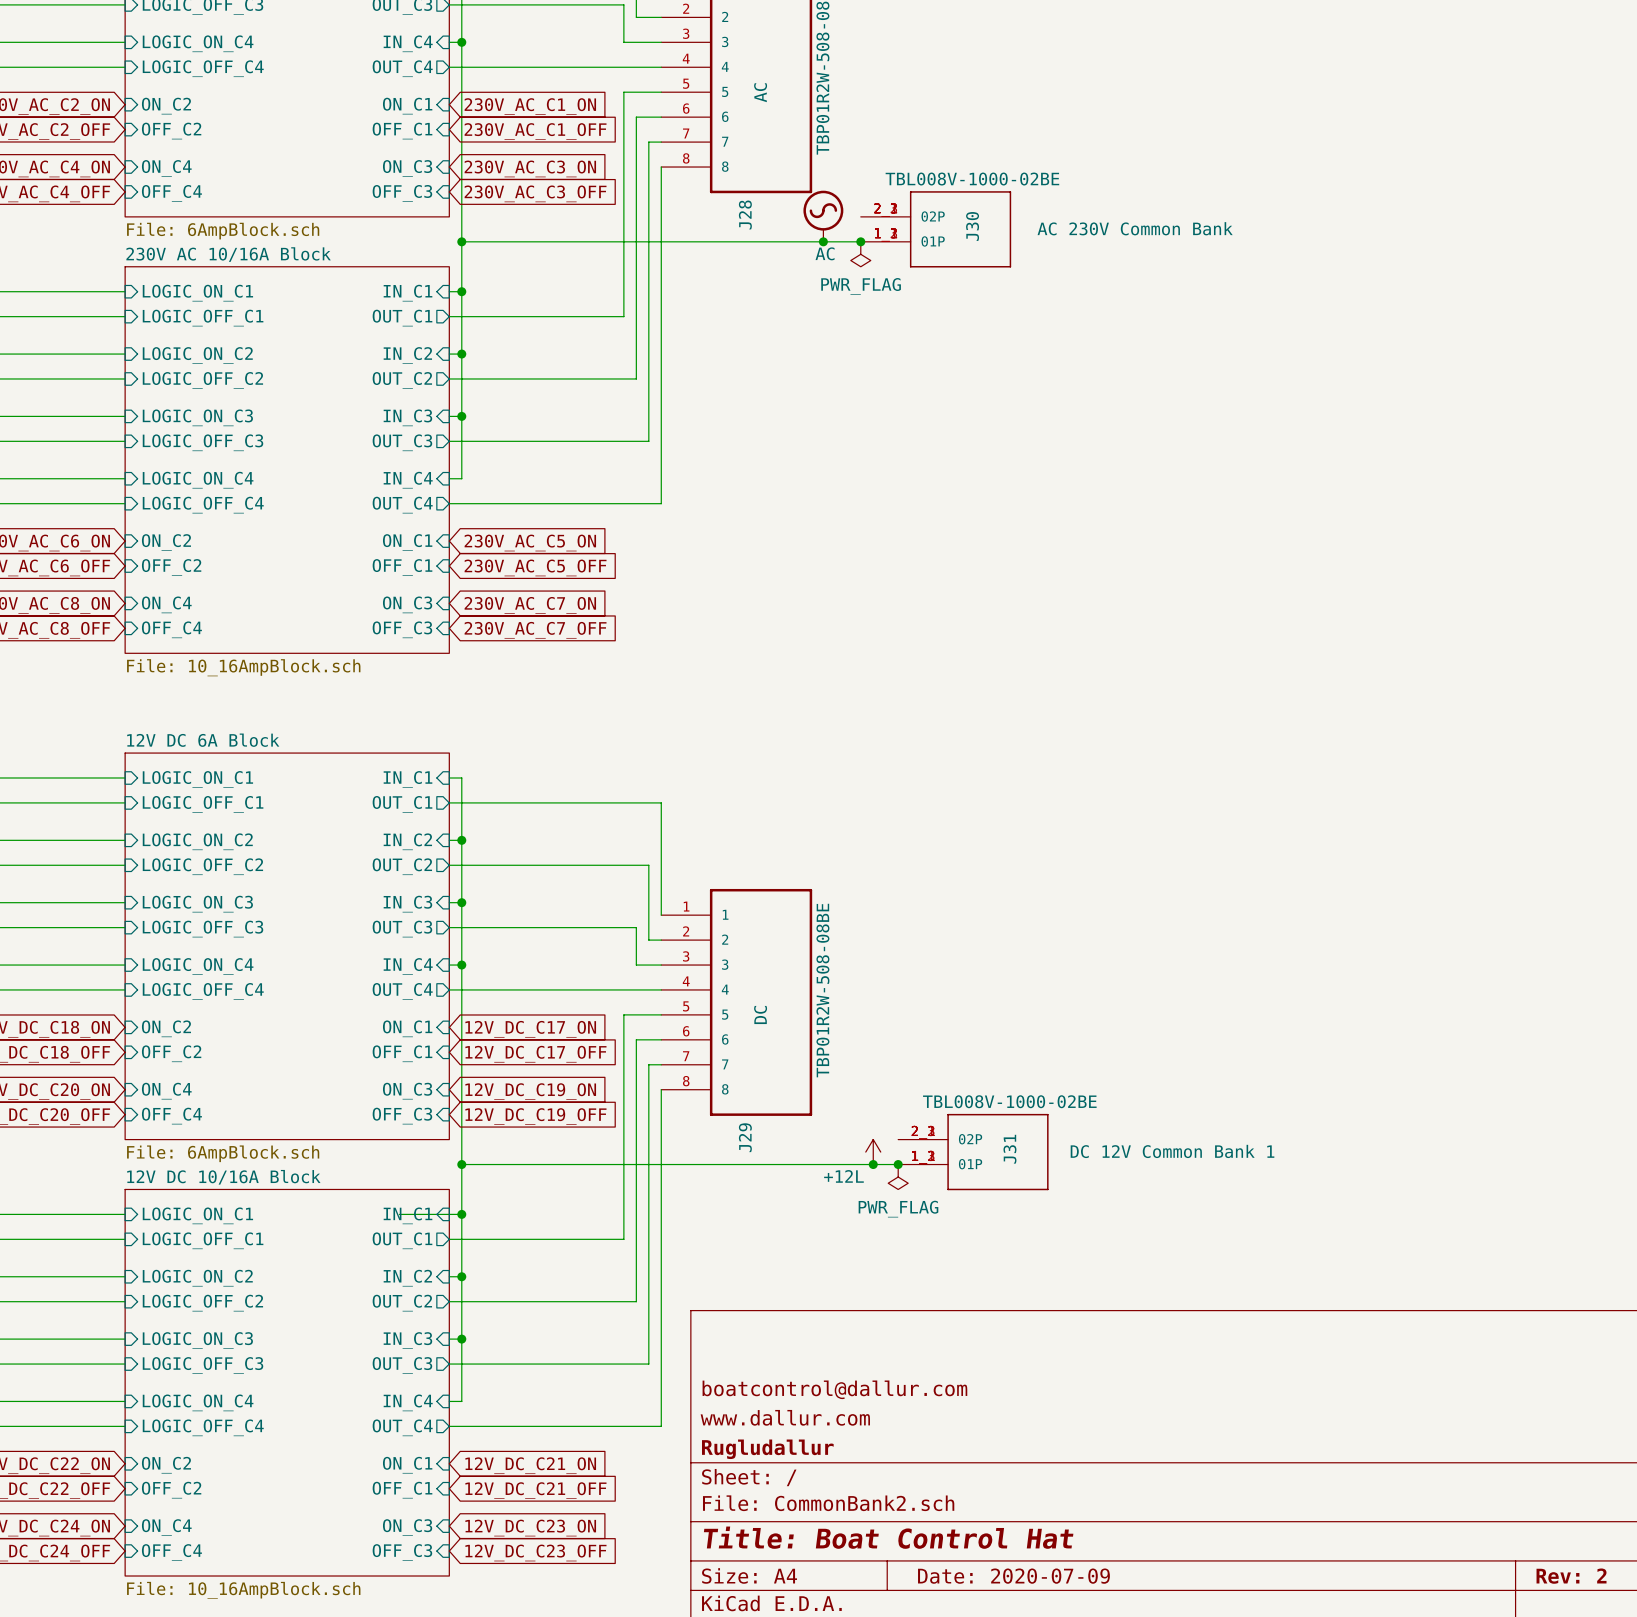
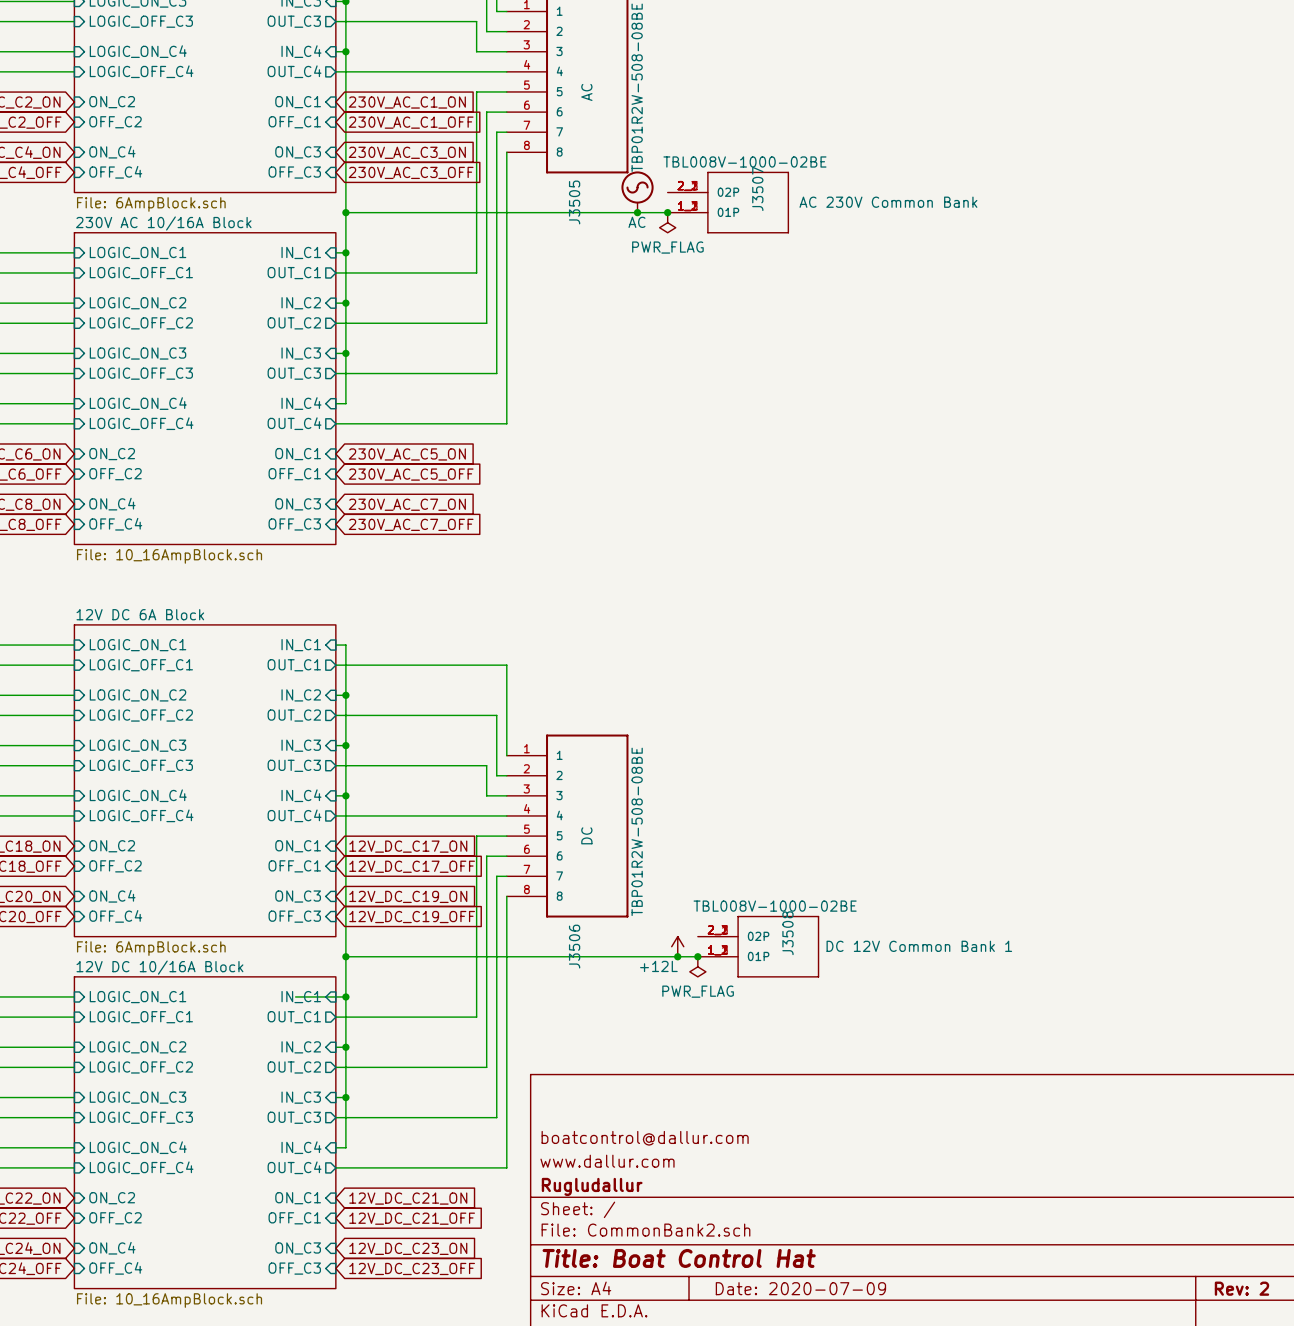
J28 name: J28 (745, 214) -> J3505 (574, 202)
J30 name: J30 (972, 226) -> J3507 (757, 188)
J29 name: J29 (745, 1137) -> J3506 (574, 946)
J31 name: J31 (1009, 1149) -> J3508 (787, 933)

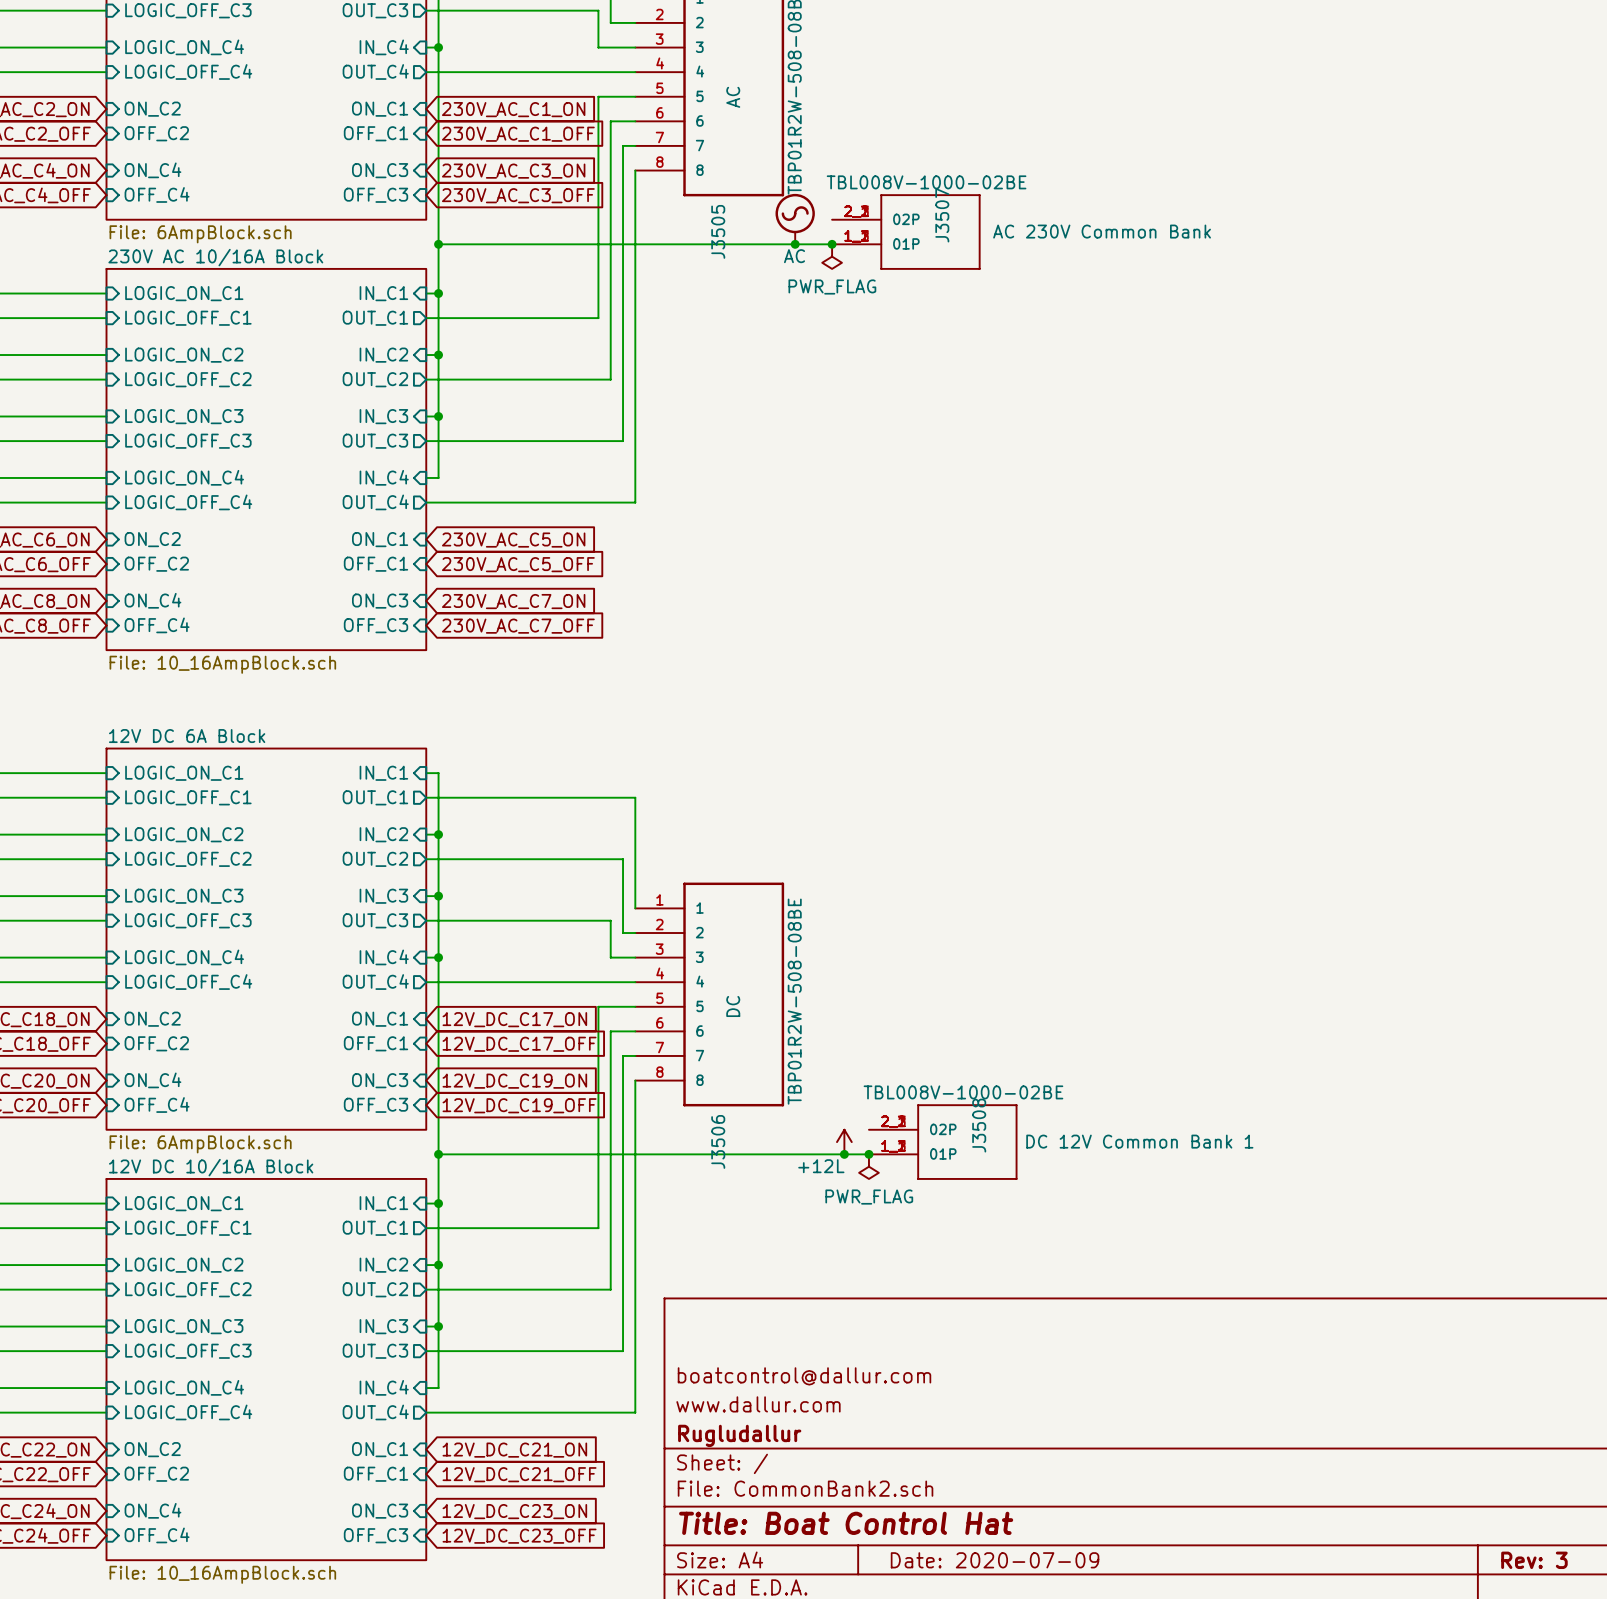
wire: (295, 996) (335, 996) -> none
title block: Rev: 2 (1241, 1288) -> Rev: 3 (1534, 1560)

